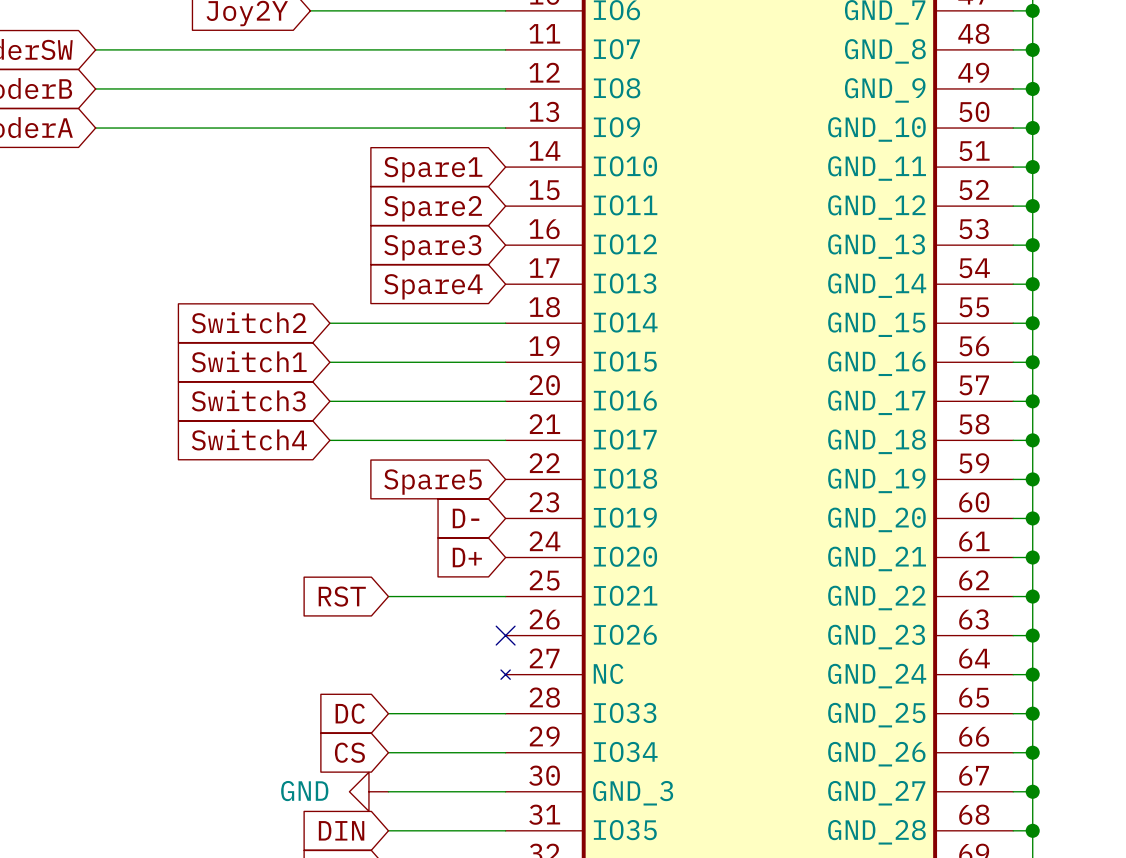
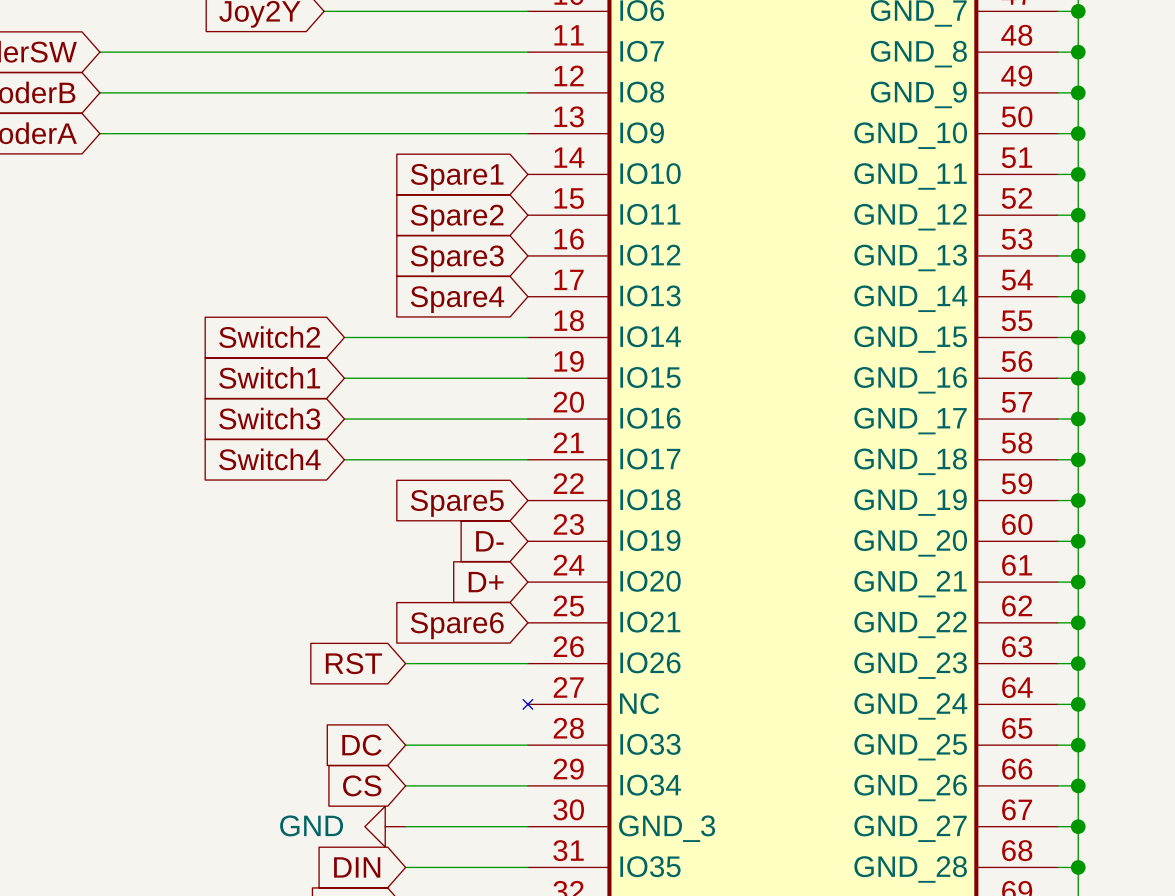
global label position: RST (342, 596) -> RST (353, 663)
wire: (388, 596) (505, 596) -> (405, 663) (527, 663)
global label: none -> Spare6 (457, 625)
no-connect mark: (505, 635) -> none

